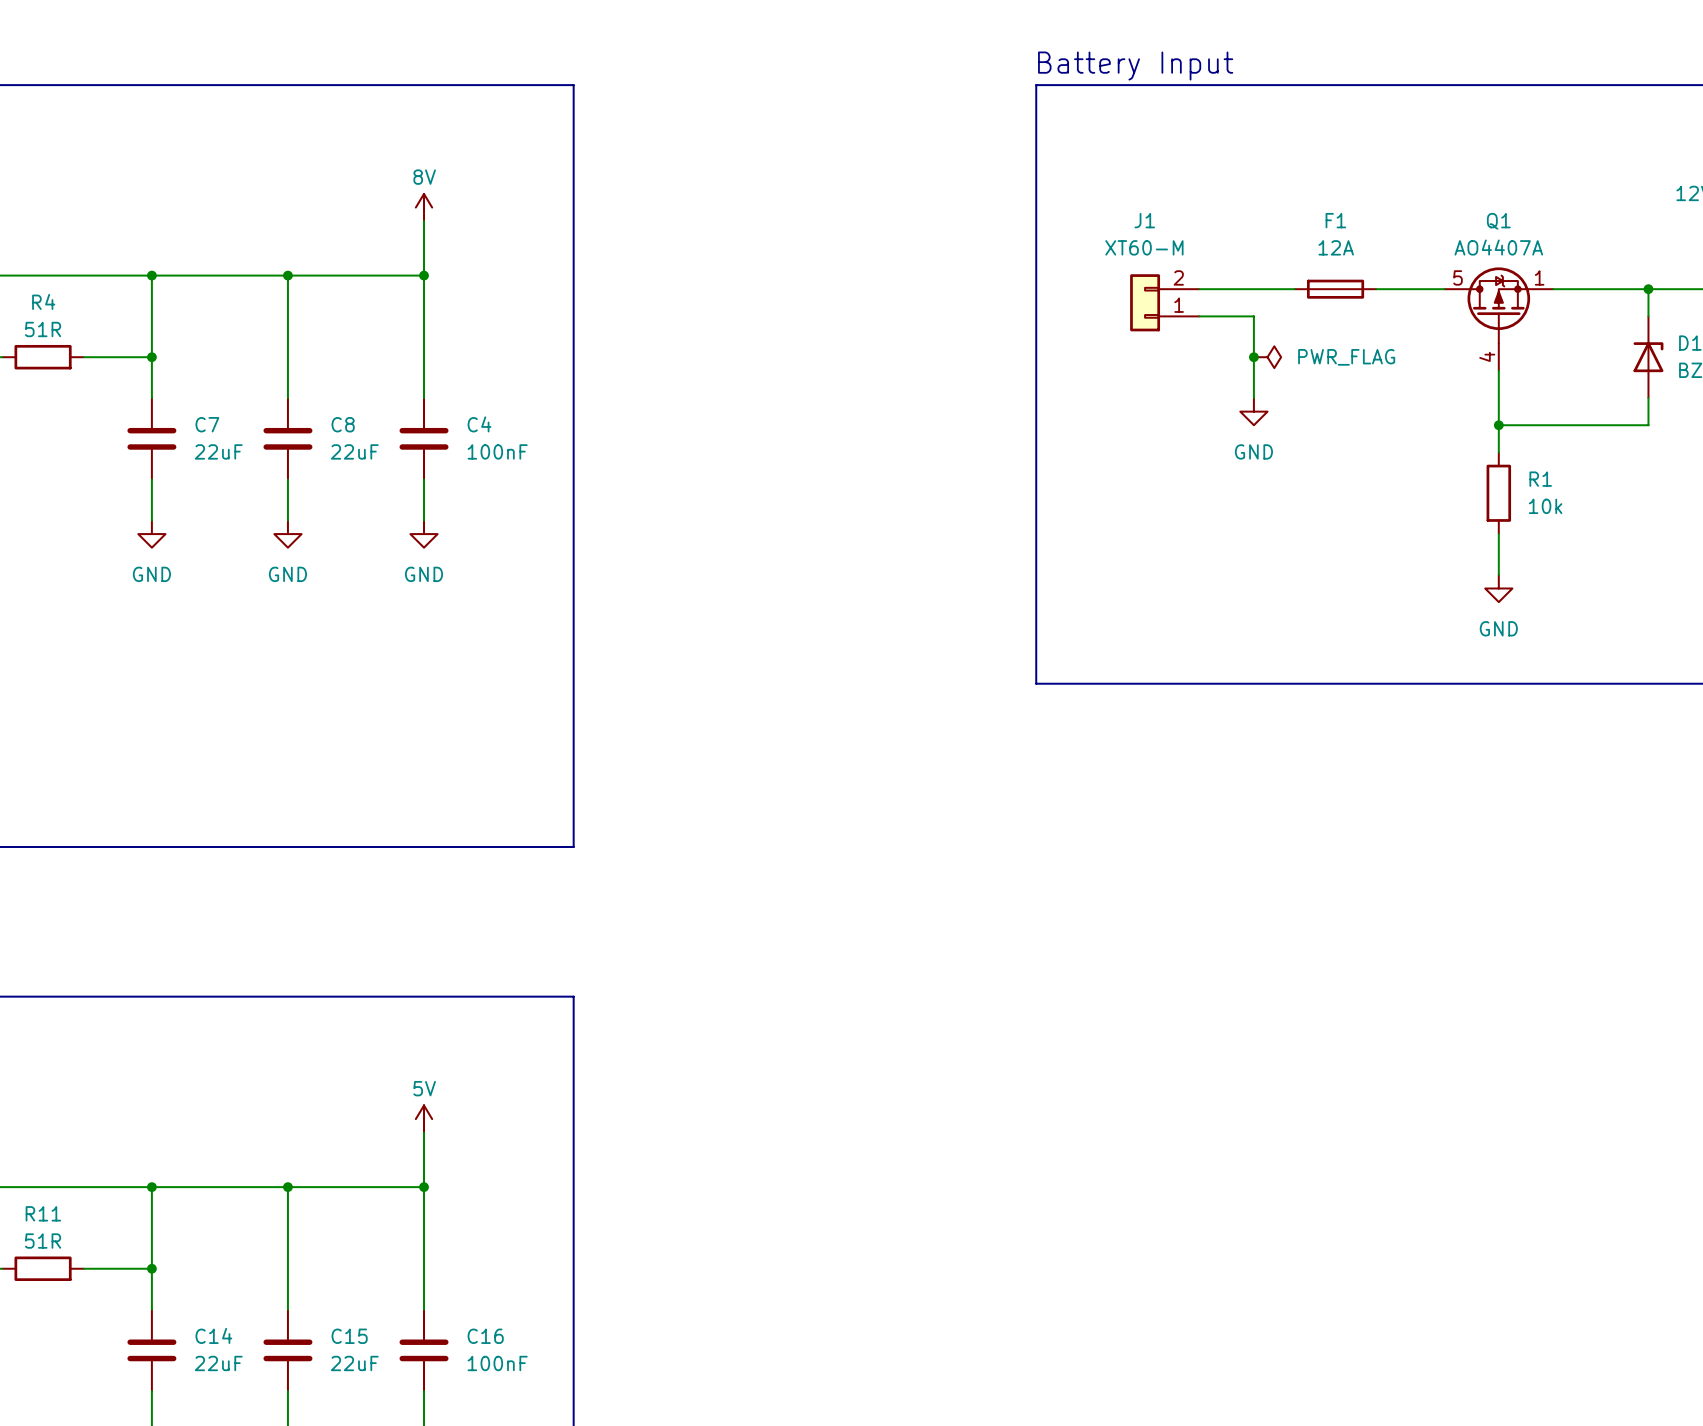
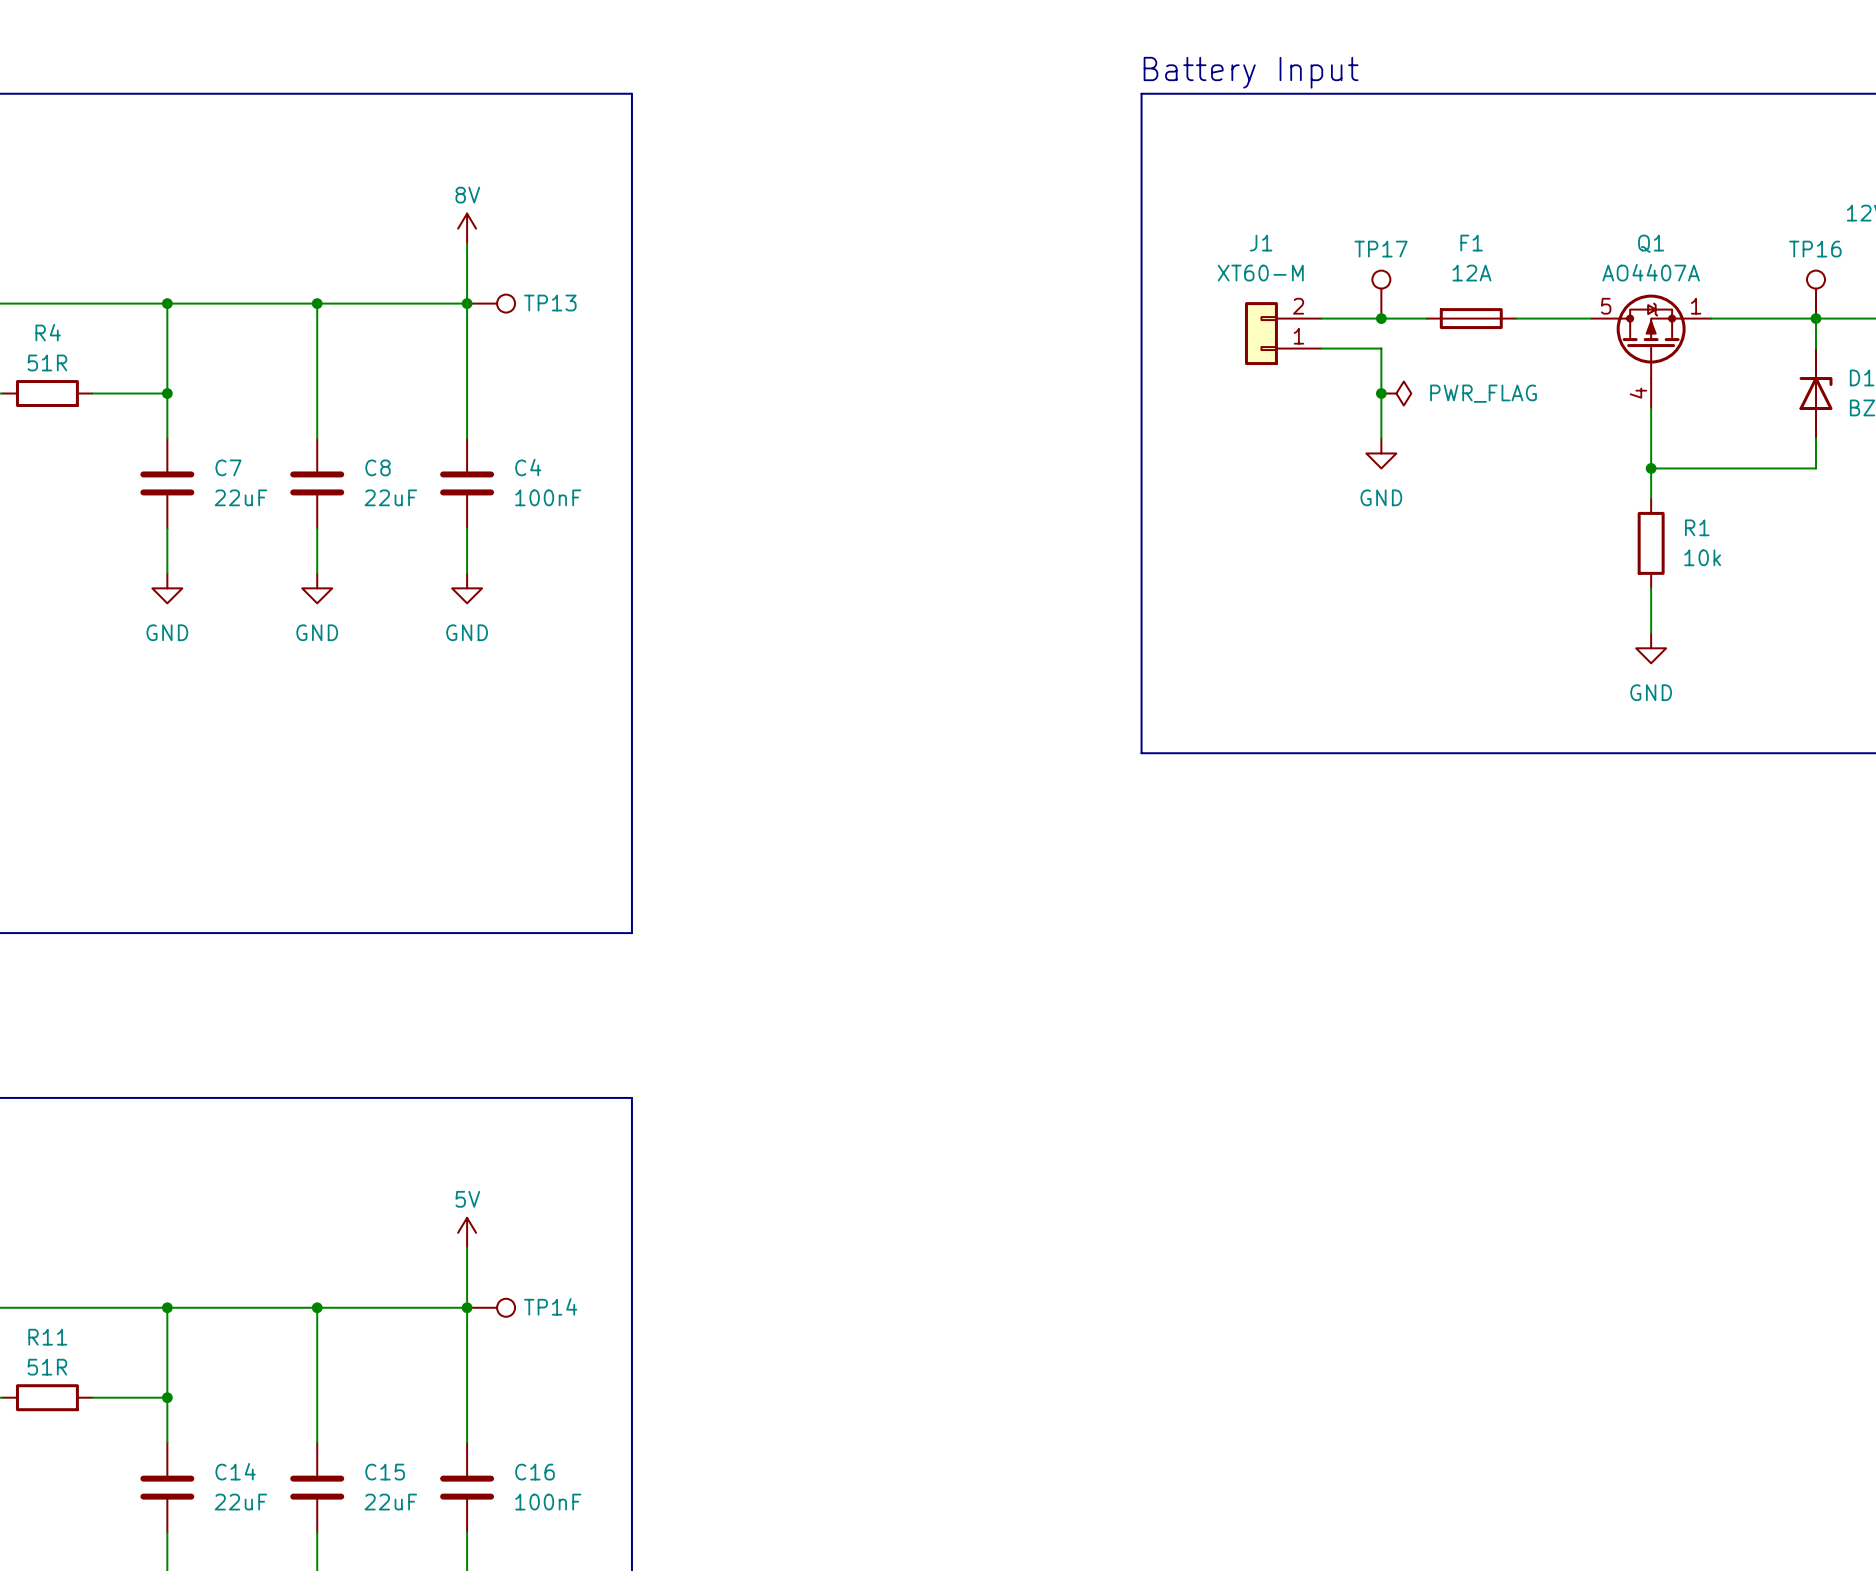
TP17: none -> (1381, 294)
TP16: none -> (1816, 294)
TP13: none -> (491, 303)
junction: none -> (1381, 318)
TP14: none -> (491, 1307)

